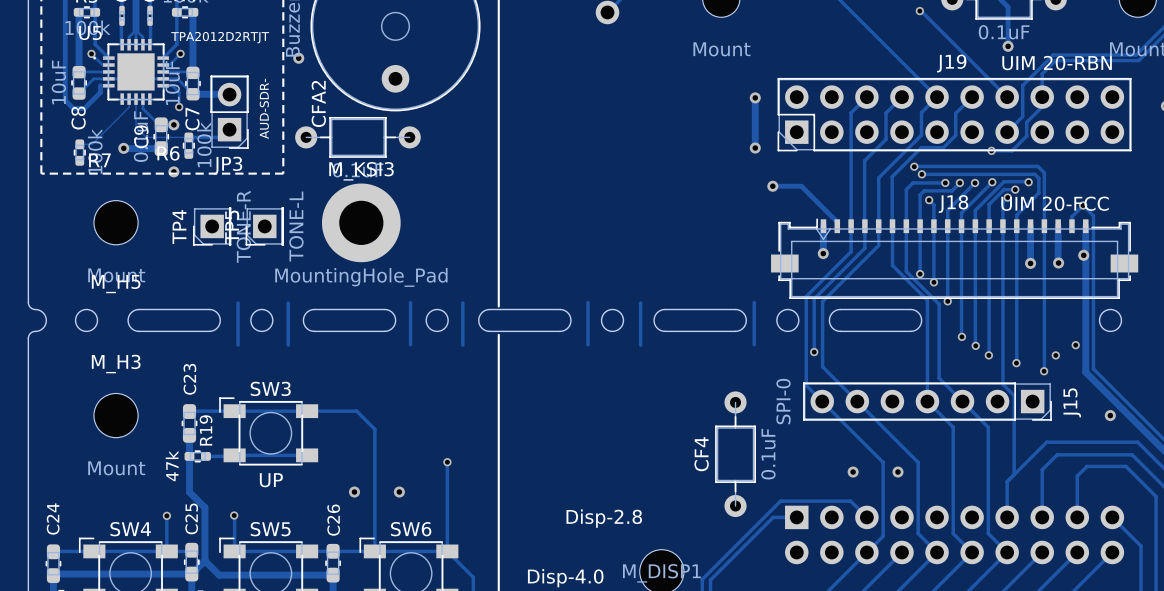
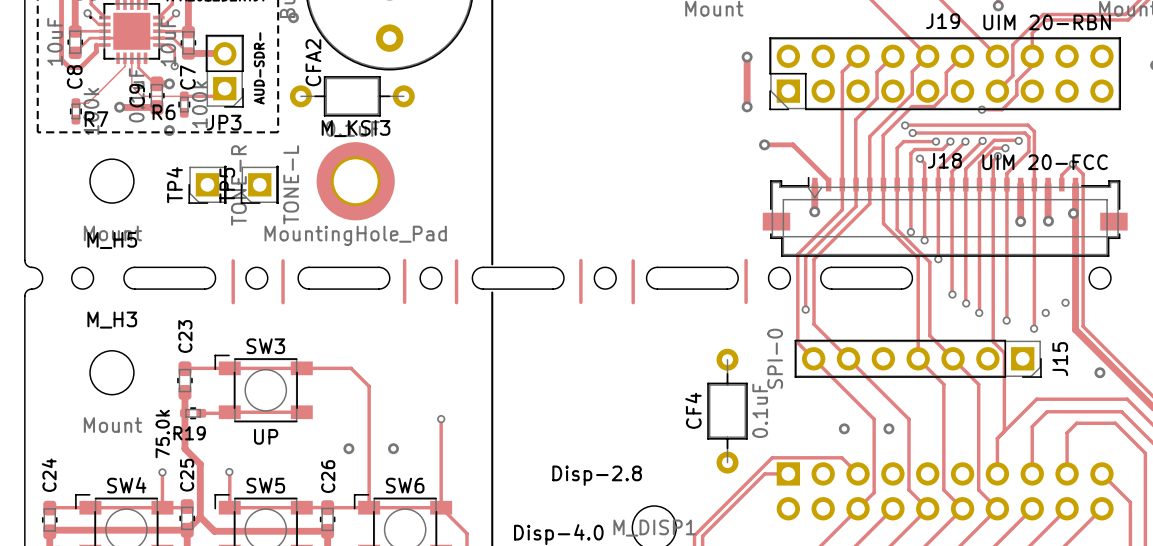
R19 name rotation: 0° (206, 430) -> 90° clockwise (189, 433)
R19 name position: R19 (206, 430) -> R19 (189, 433)
R19 value: 47k (172, 466) -> 75.0k (162, 434)

